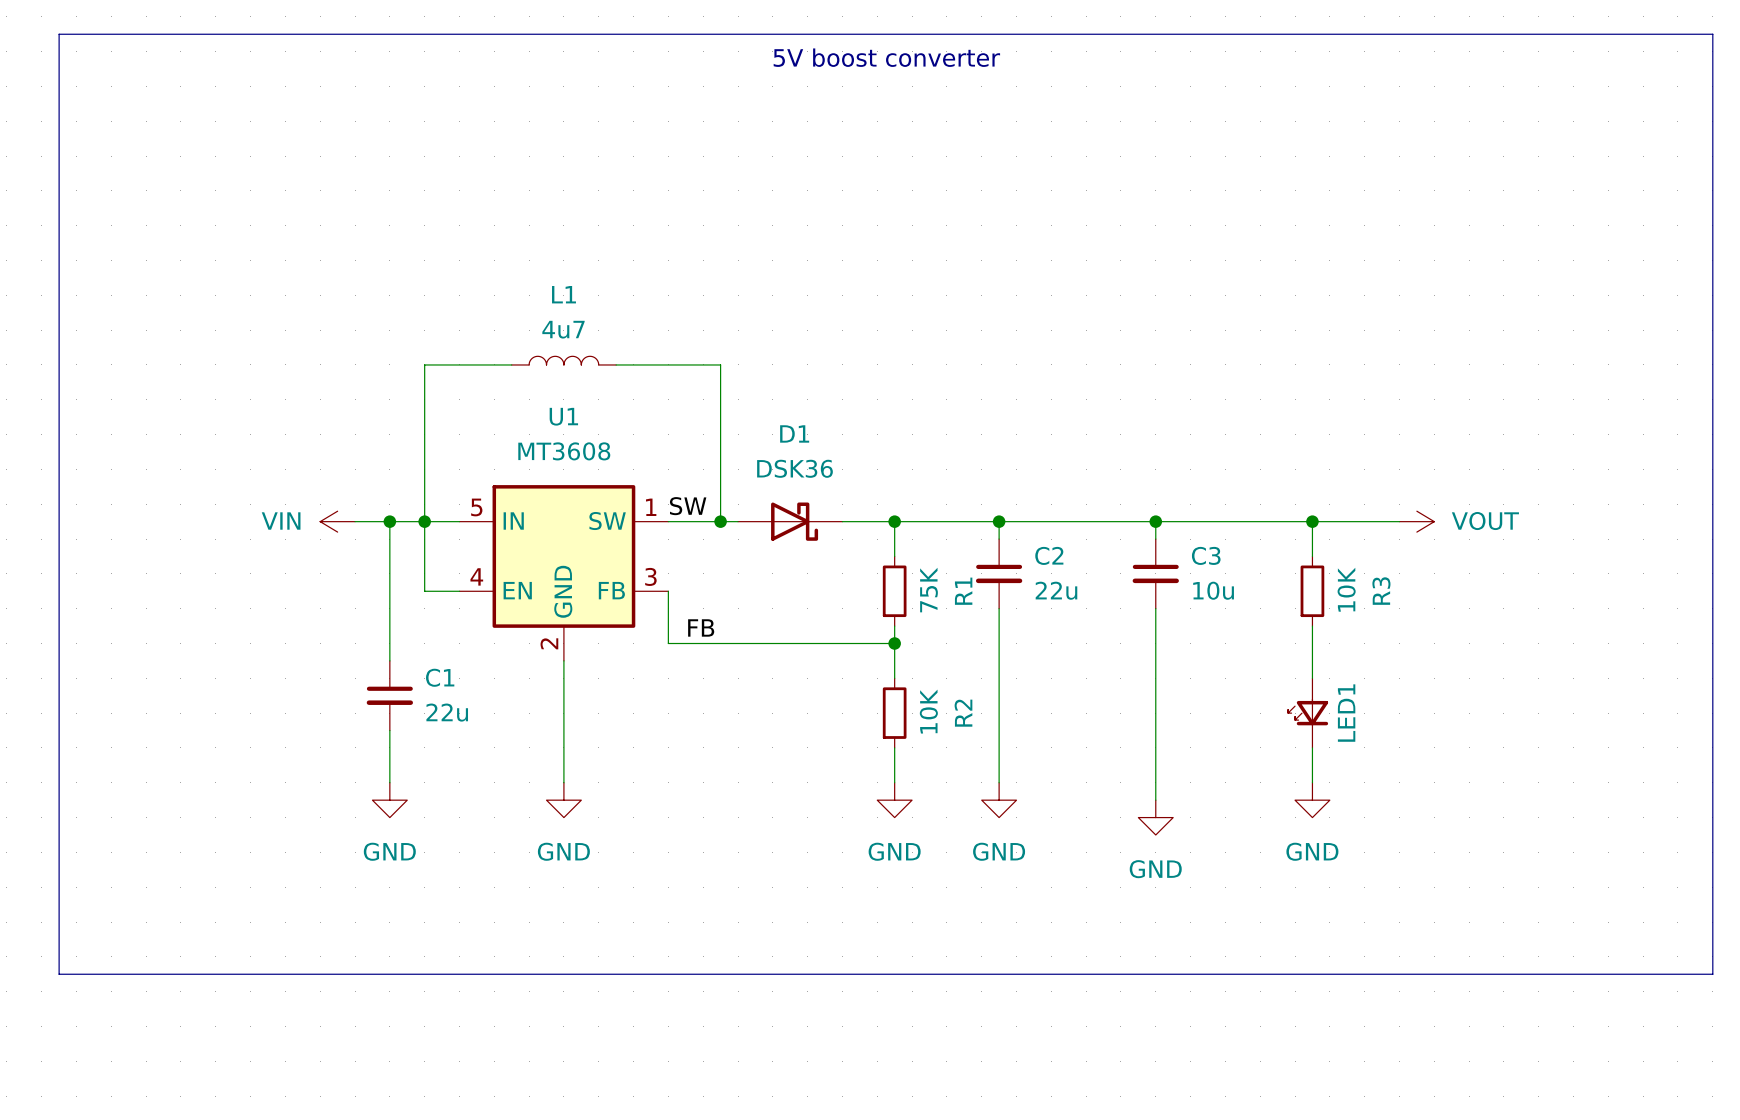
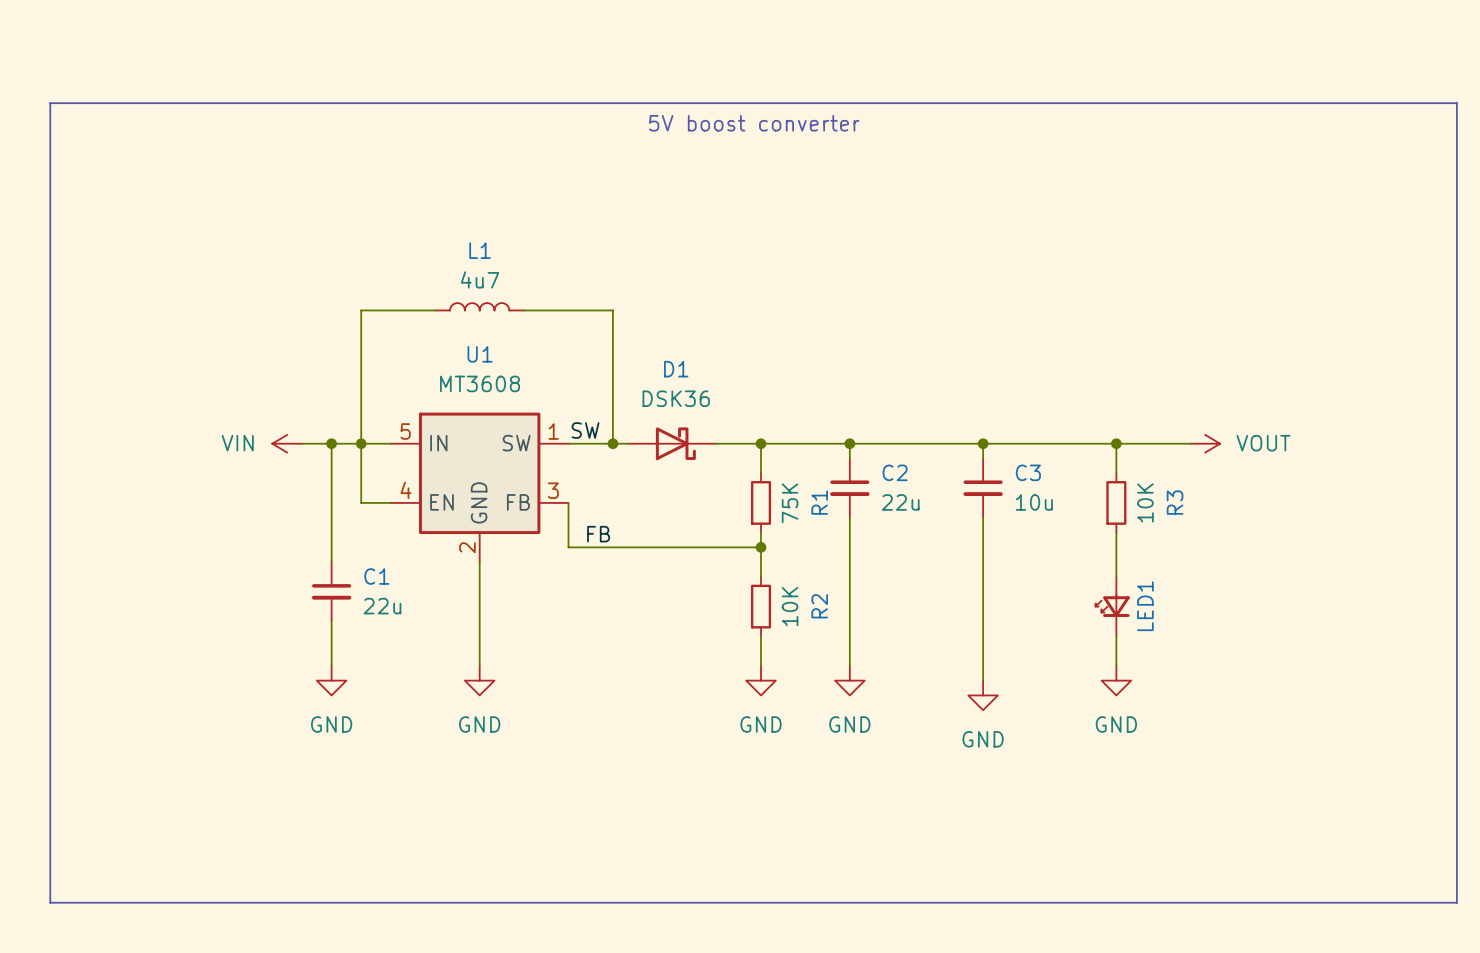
text position: 5V boost converter (886, 57) -> 5V boost converter (754, 123)
line: (59, 121) (59, 34) (1712, 34) (1712, 121) -> (50, 103) (1456, 103)
line: (59, 974) (1712, 974) -> (50, 828) (50, 902) (1456, 902) (1456, 828)

